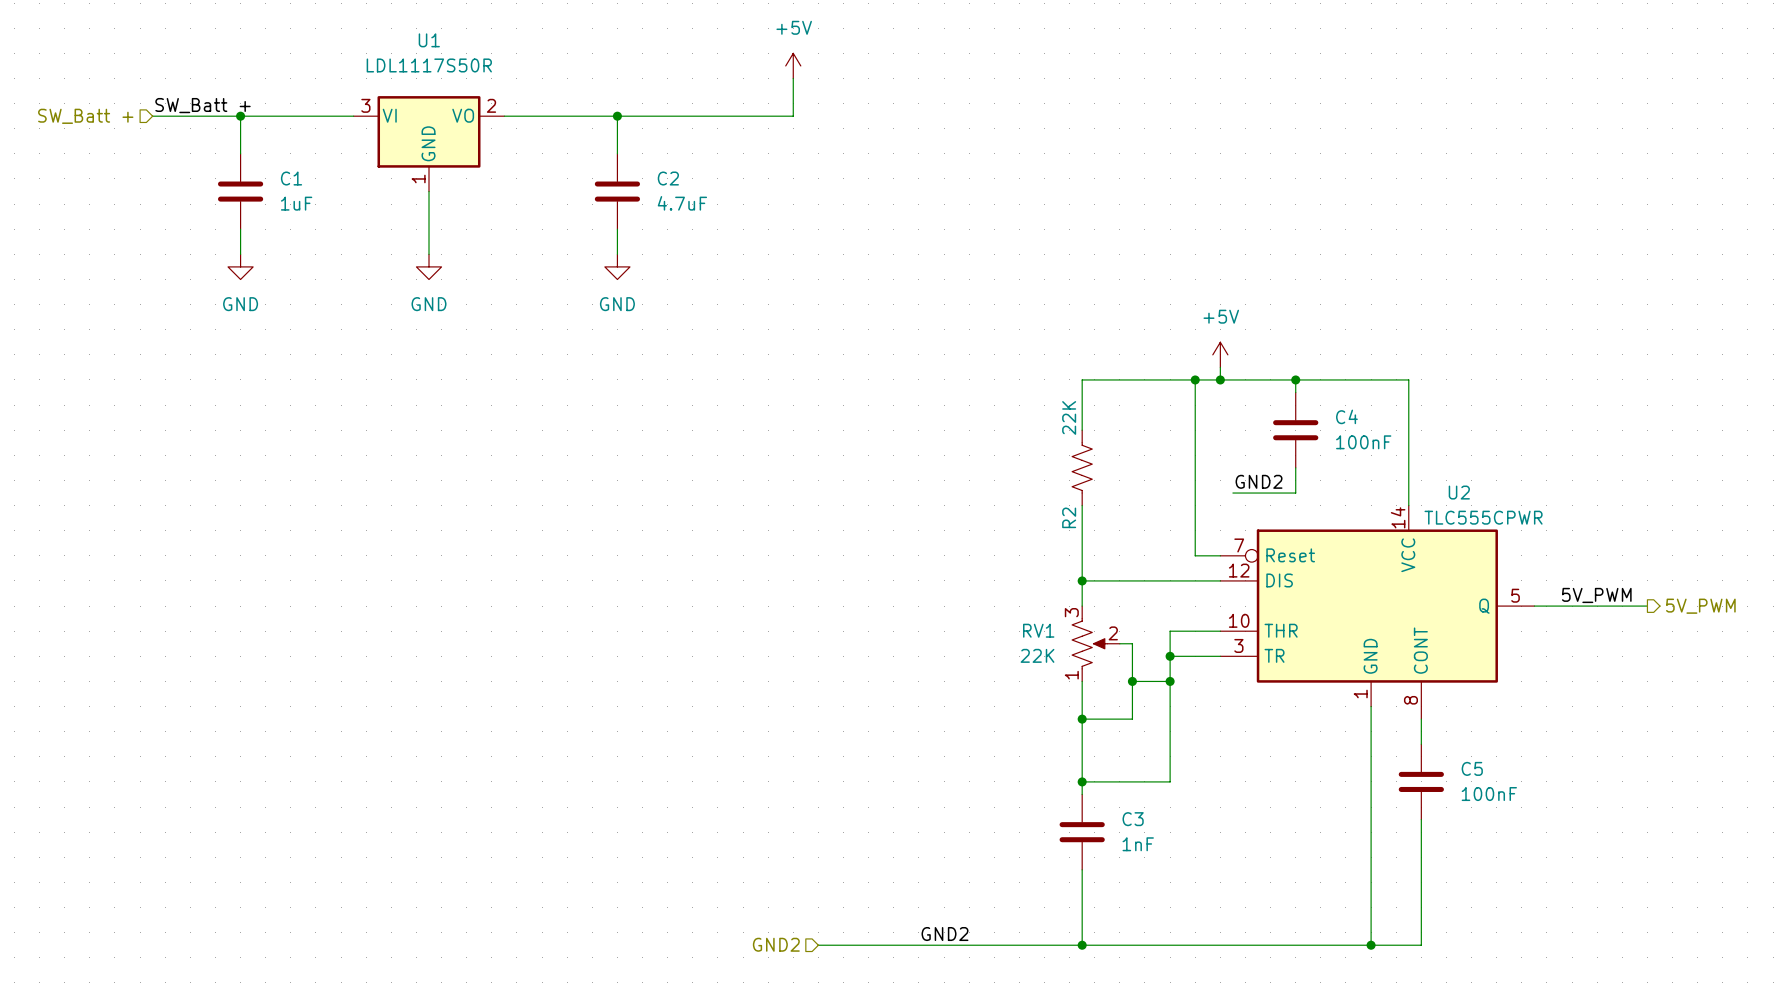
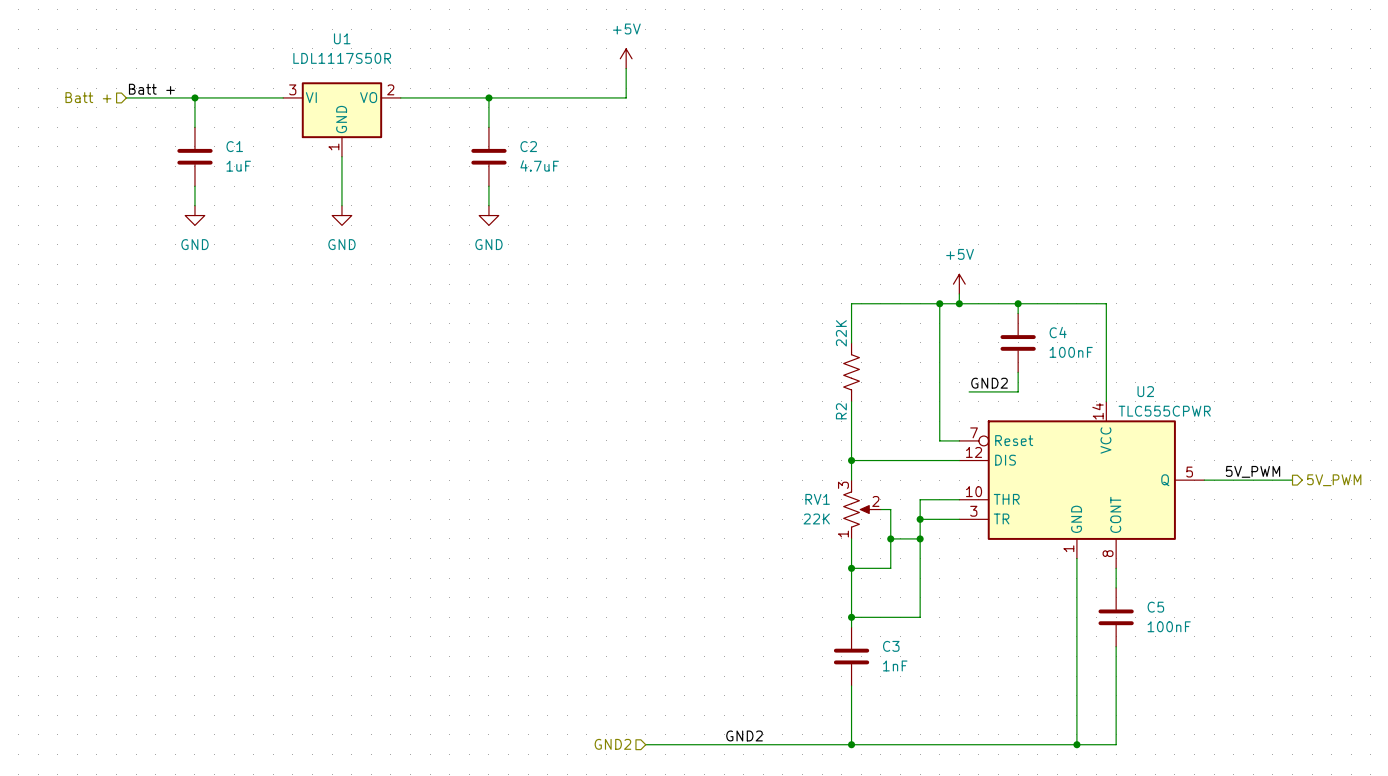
label: SW_Batt + (202, 105) -> Batt + (151, 89)
hierarchical label: SW_Batt + (85, 116) -> Batt + (88, 97)

